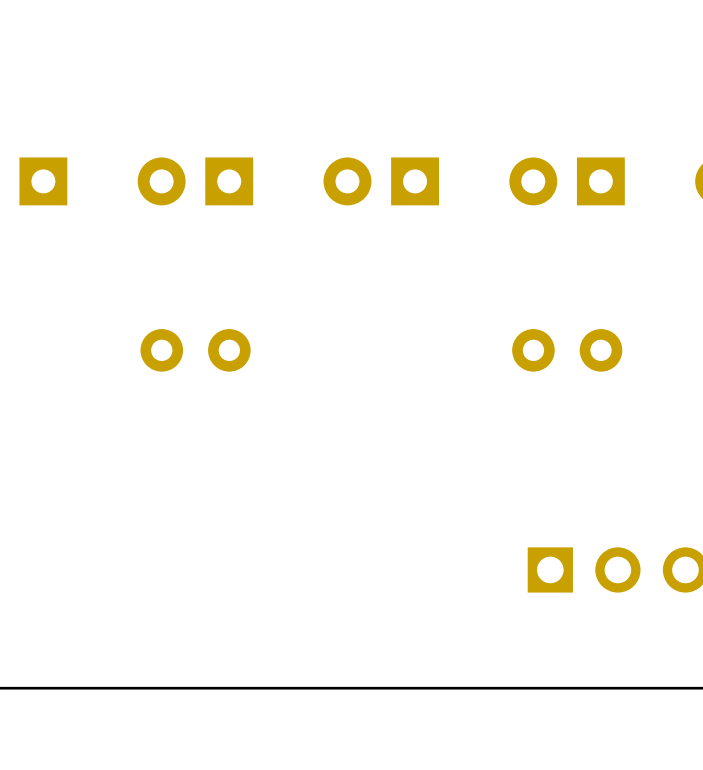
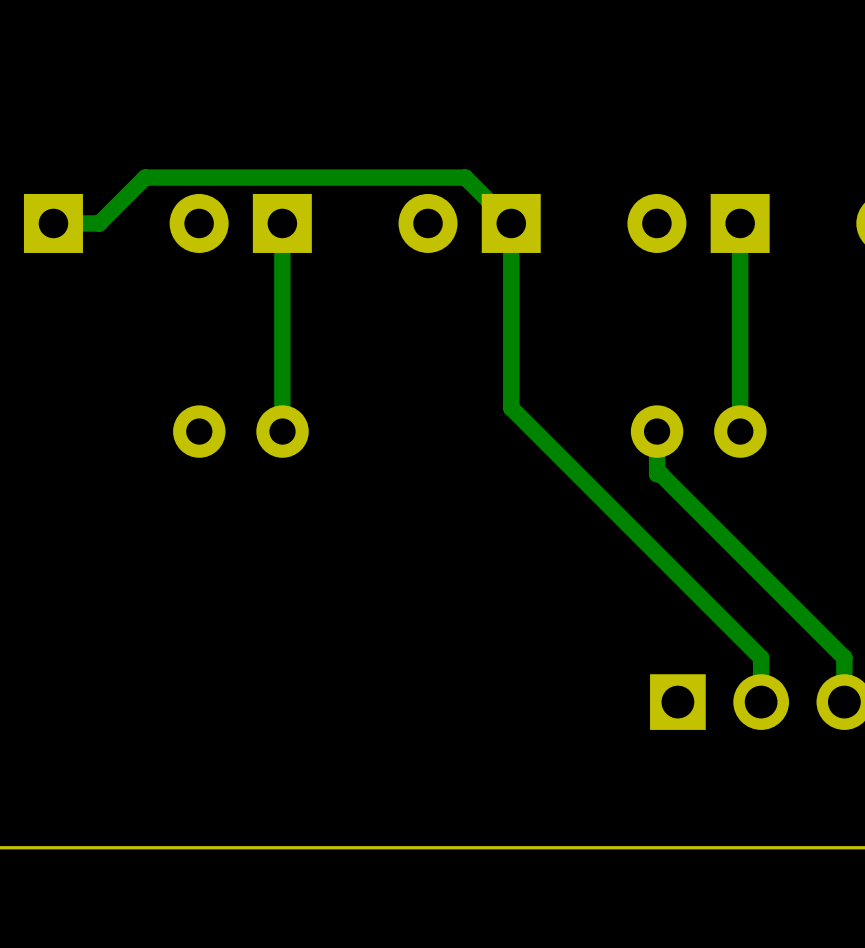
track: none -> (53, 223) (99, 223) (145, 177) (465, 177) (511, 223) (511, 407) (761, 657) (761, 702)
track: none -> (282, 223) (282, 431)
track: none -> (740, 223) (740, 431)
track: none -> (657, 431) (657, 474) (660, 474) (844, 657) (844, 702)

